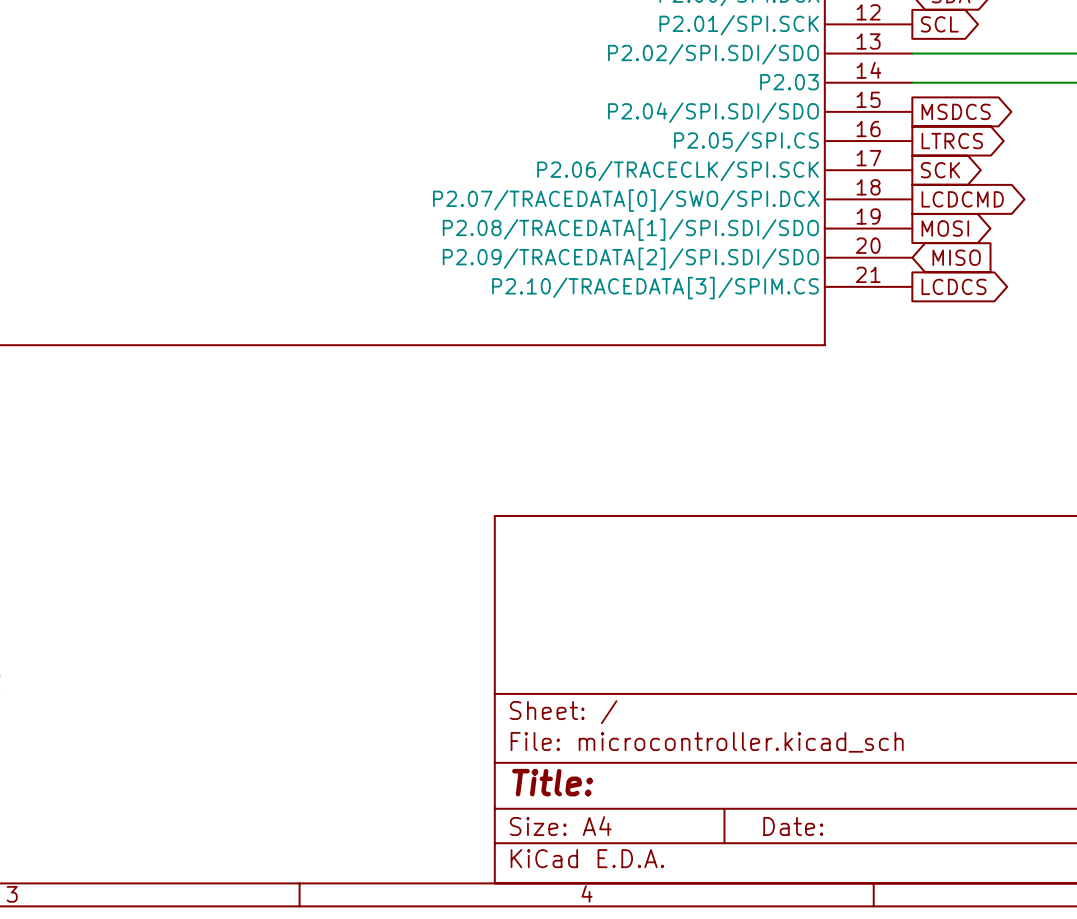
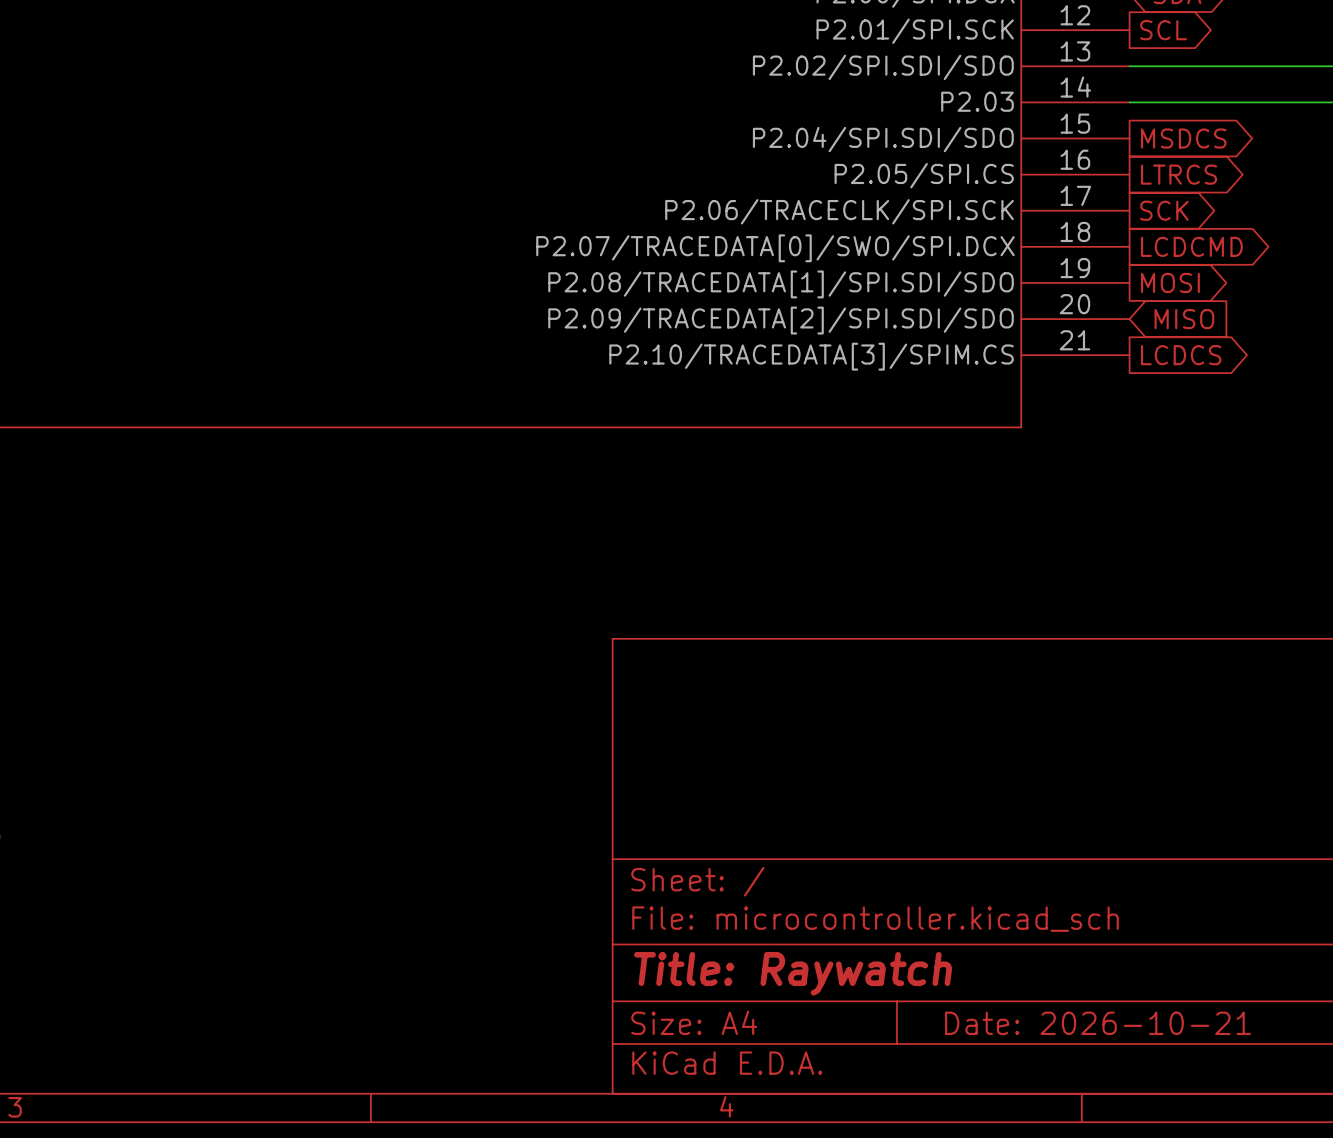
title block: Title: (552, 782) -> Title: Raywatch (793, 973)
title block: Date: (793, 826) -> Date: 2026-10-21 (1097, 1023)

